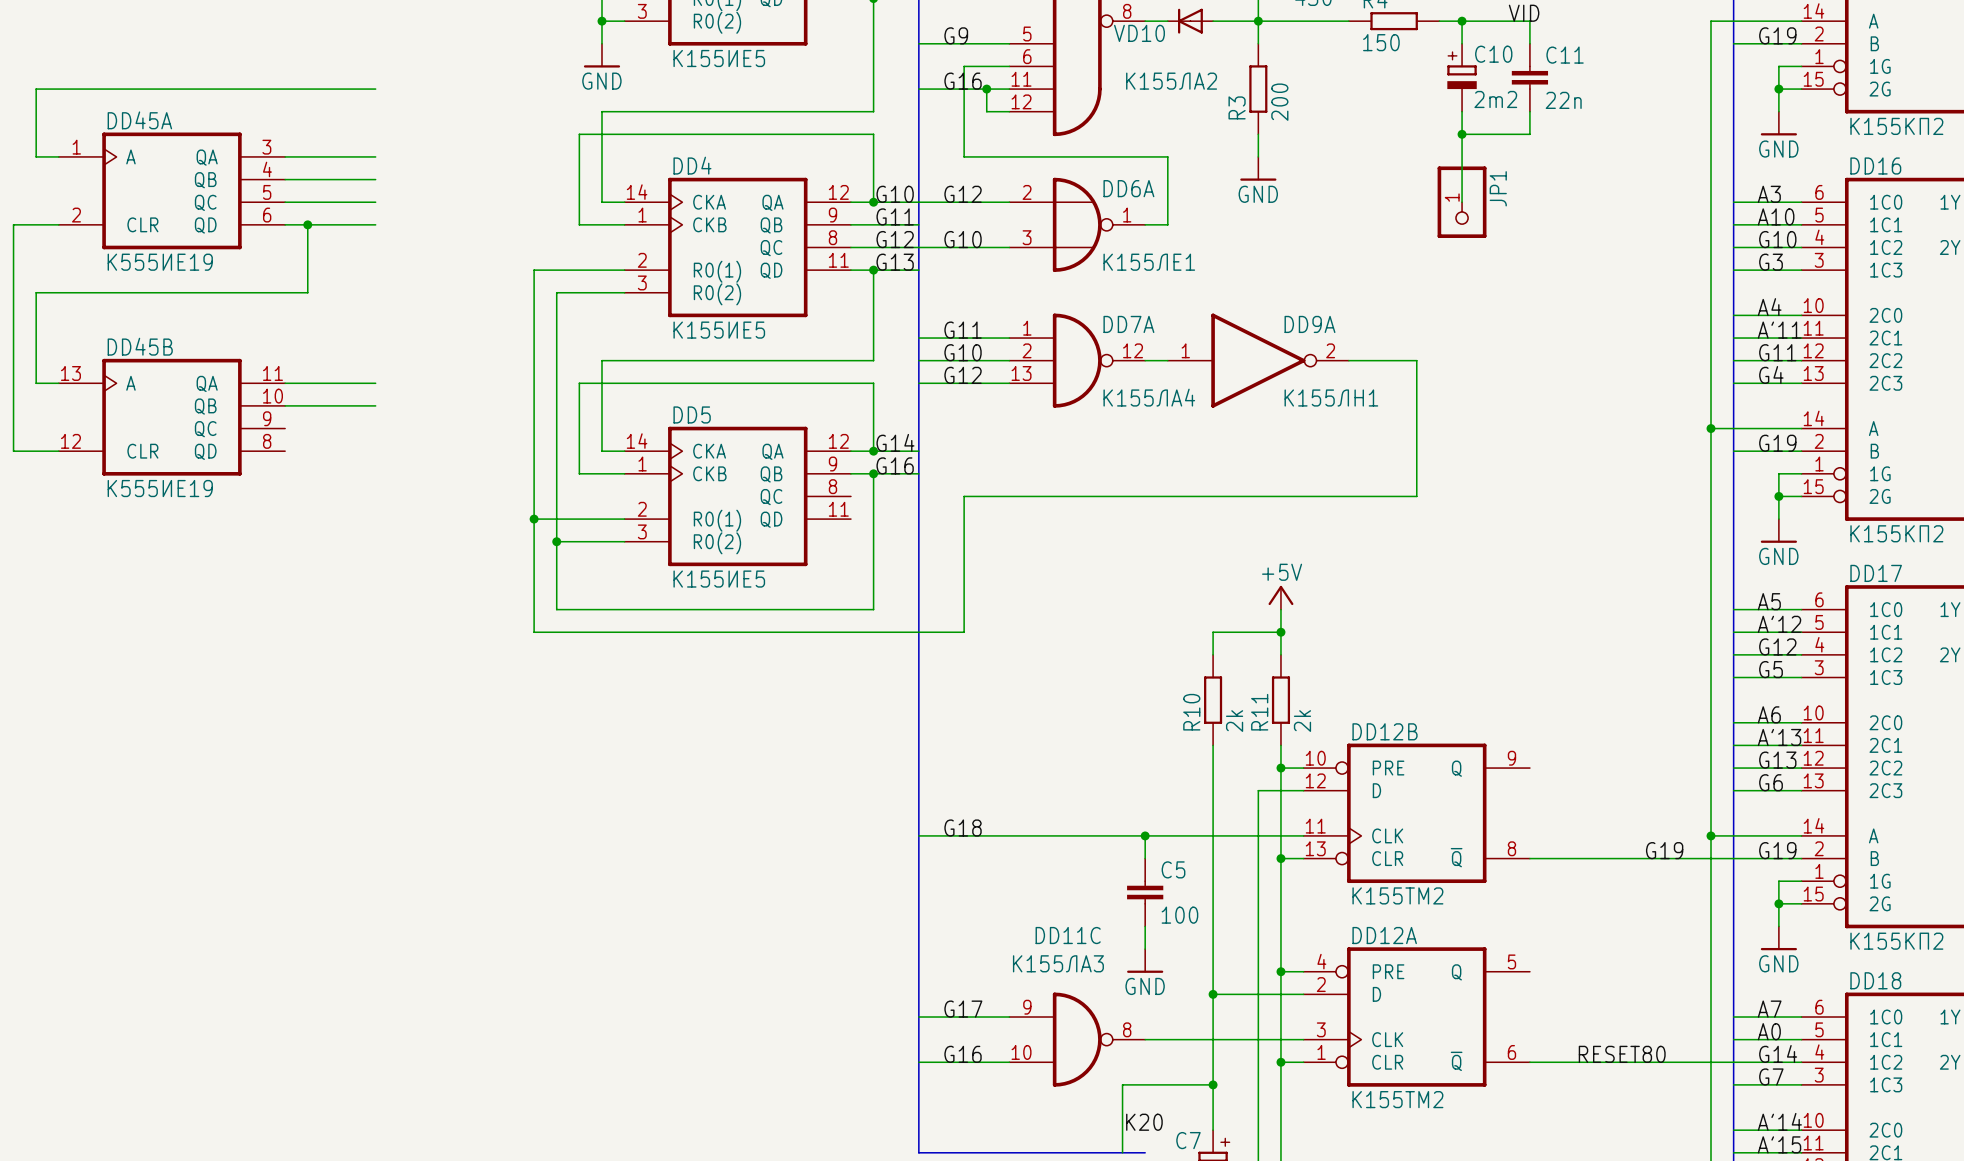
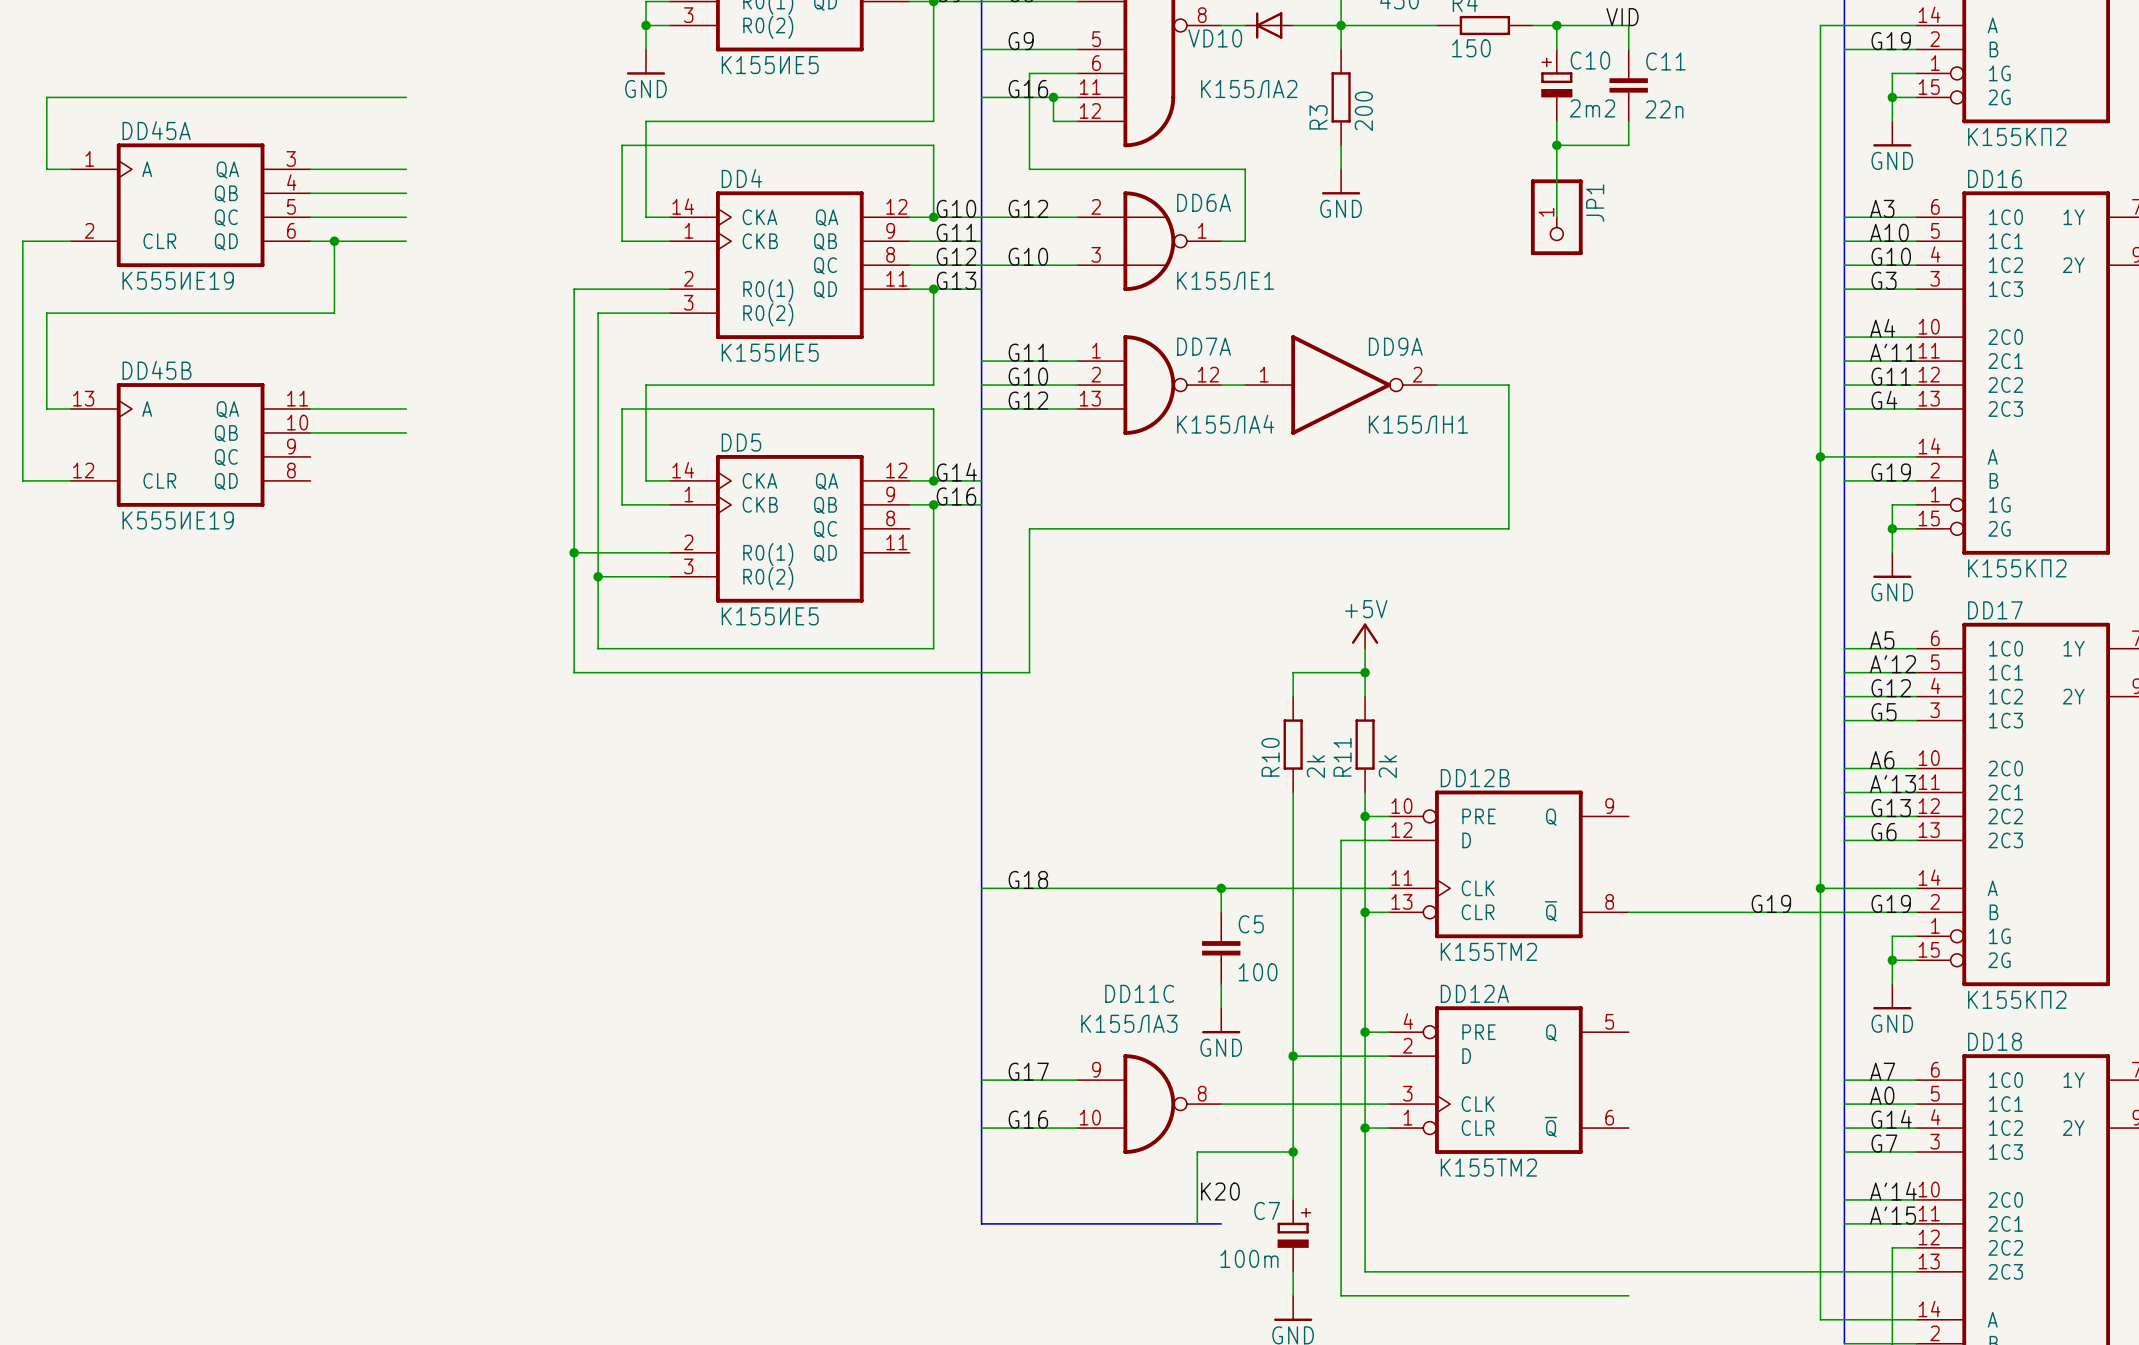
label: RESET80 (1622, 1054) -> none
wire: (1529, 1062) (1733, 1062) -> none

